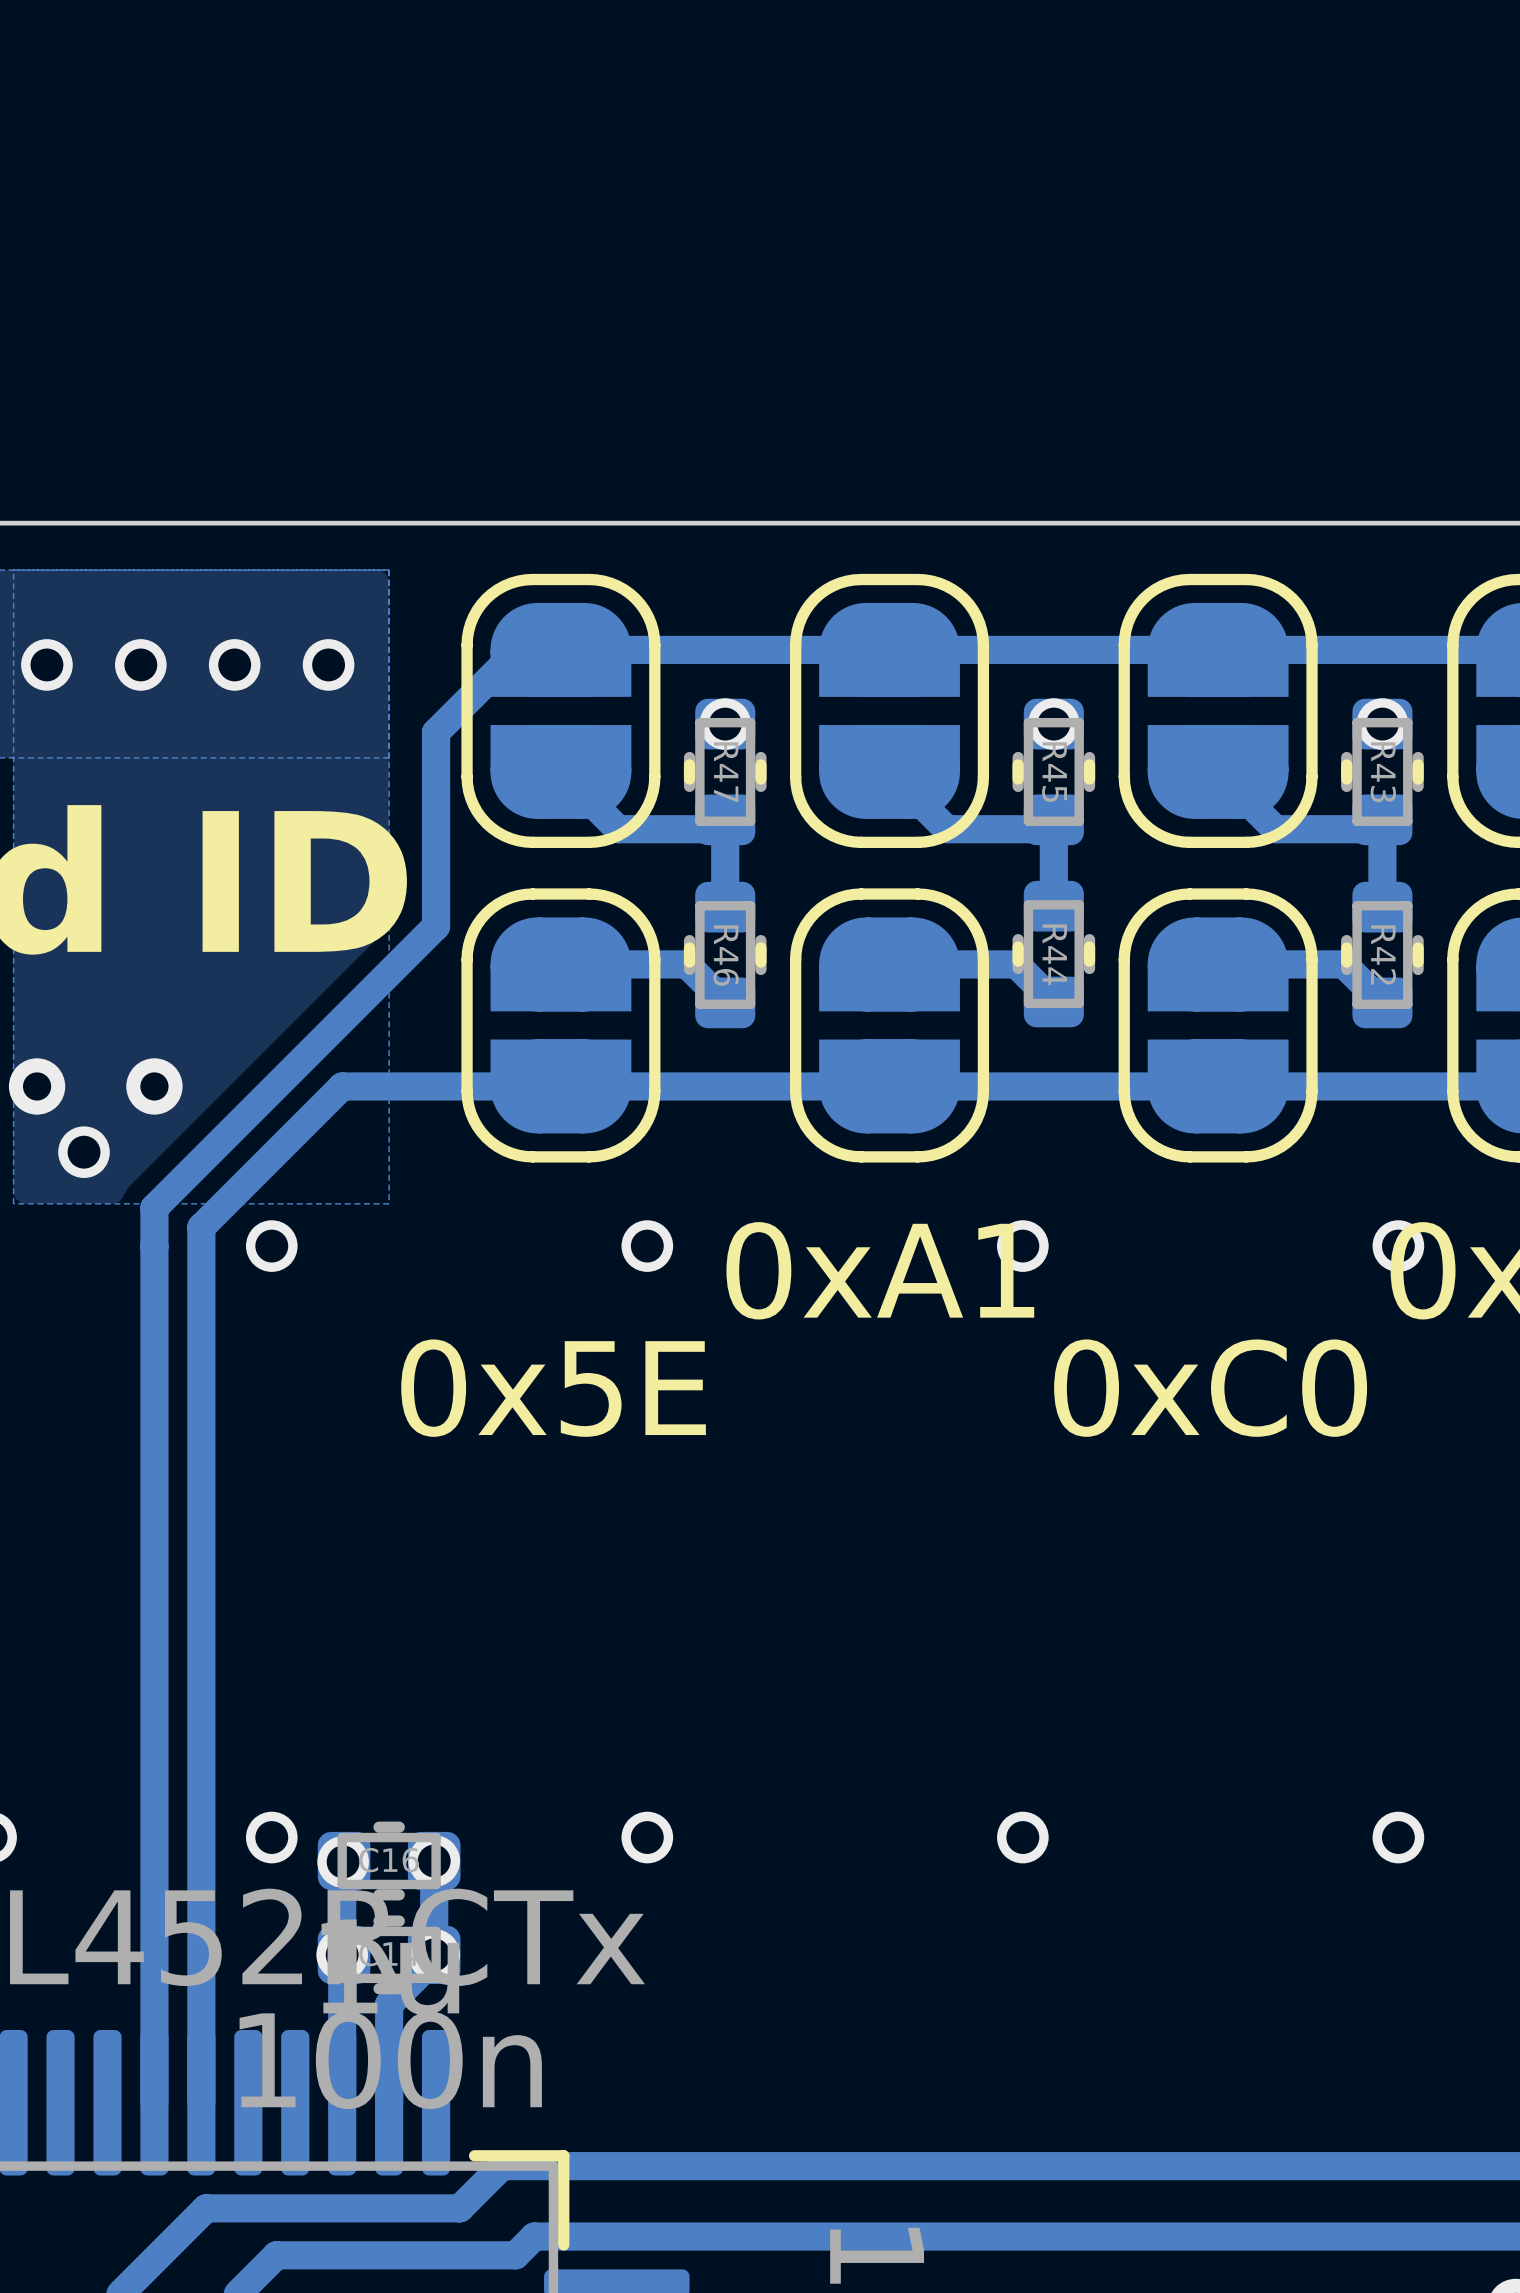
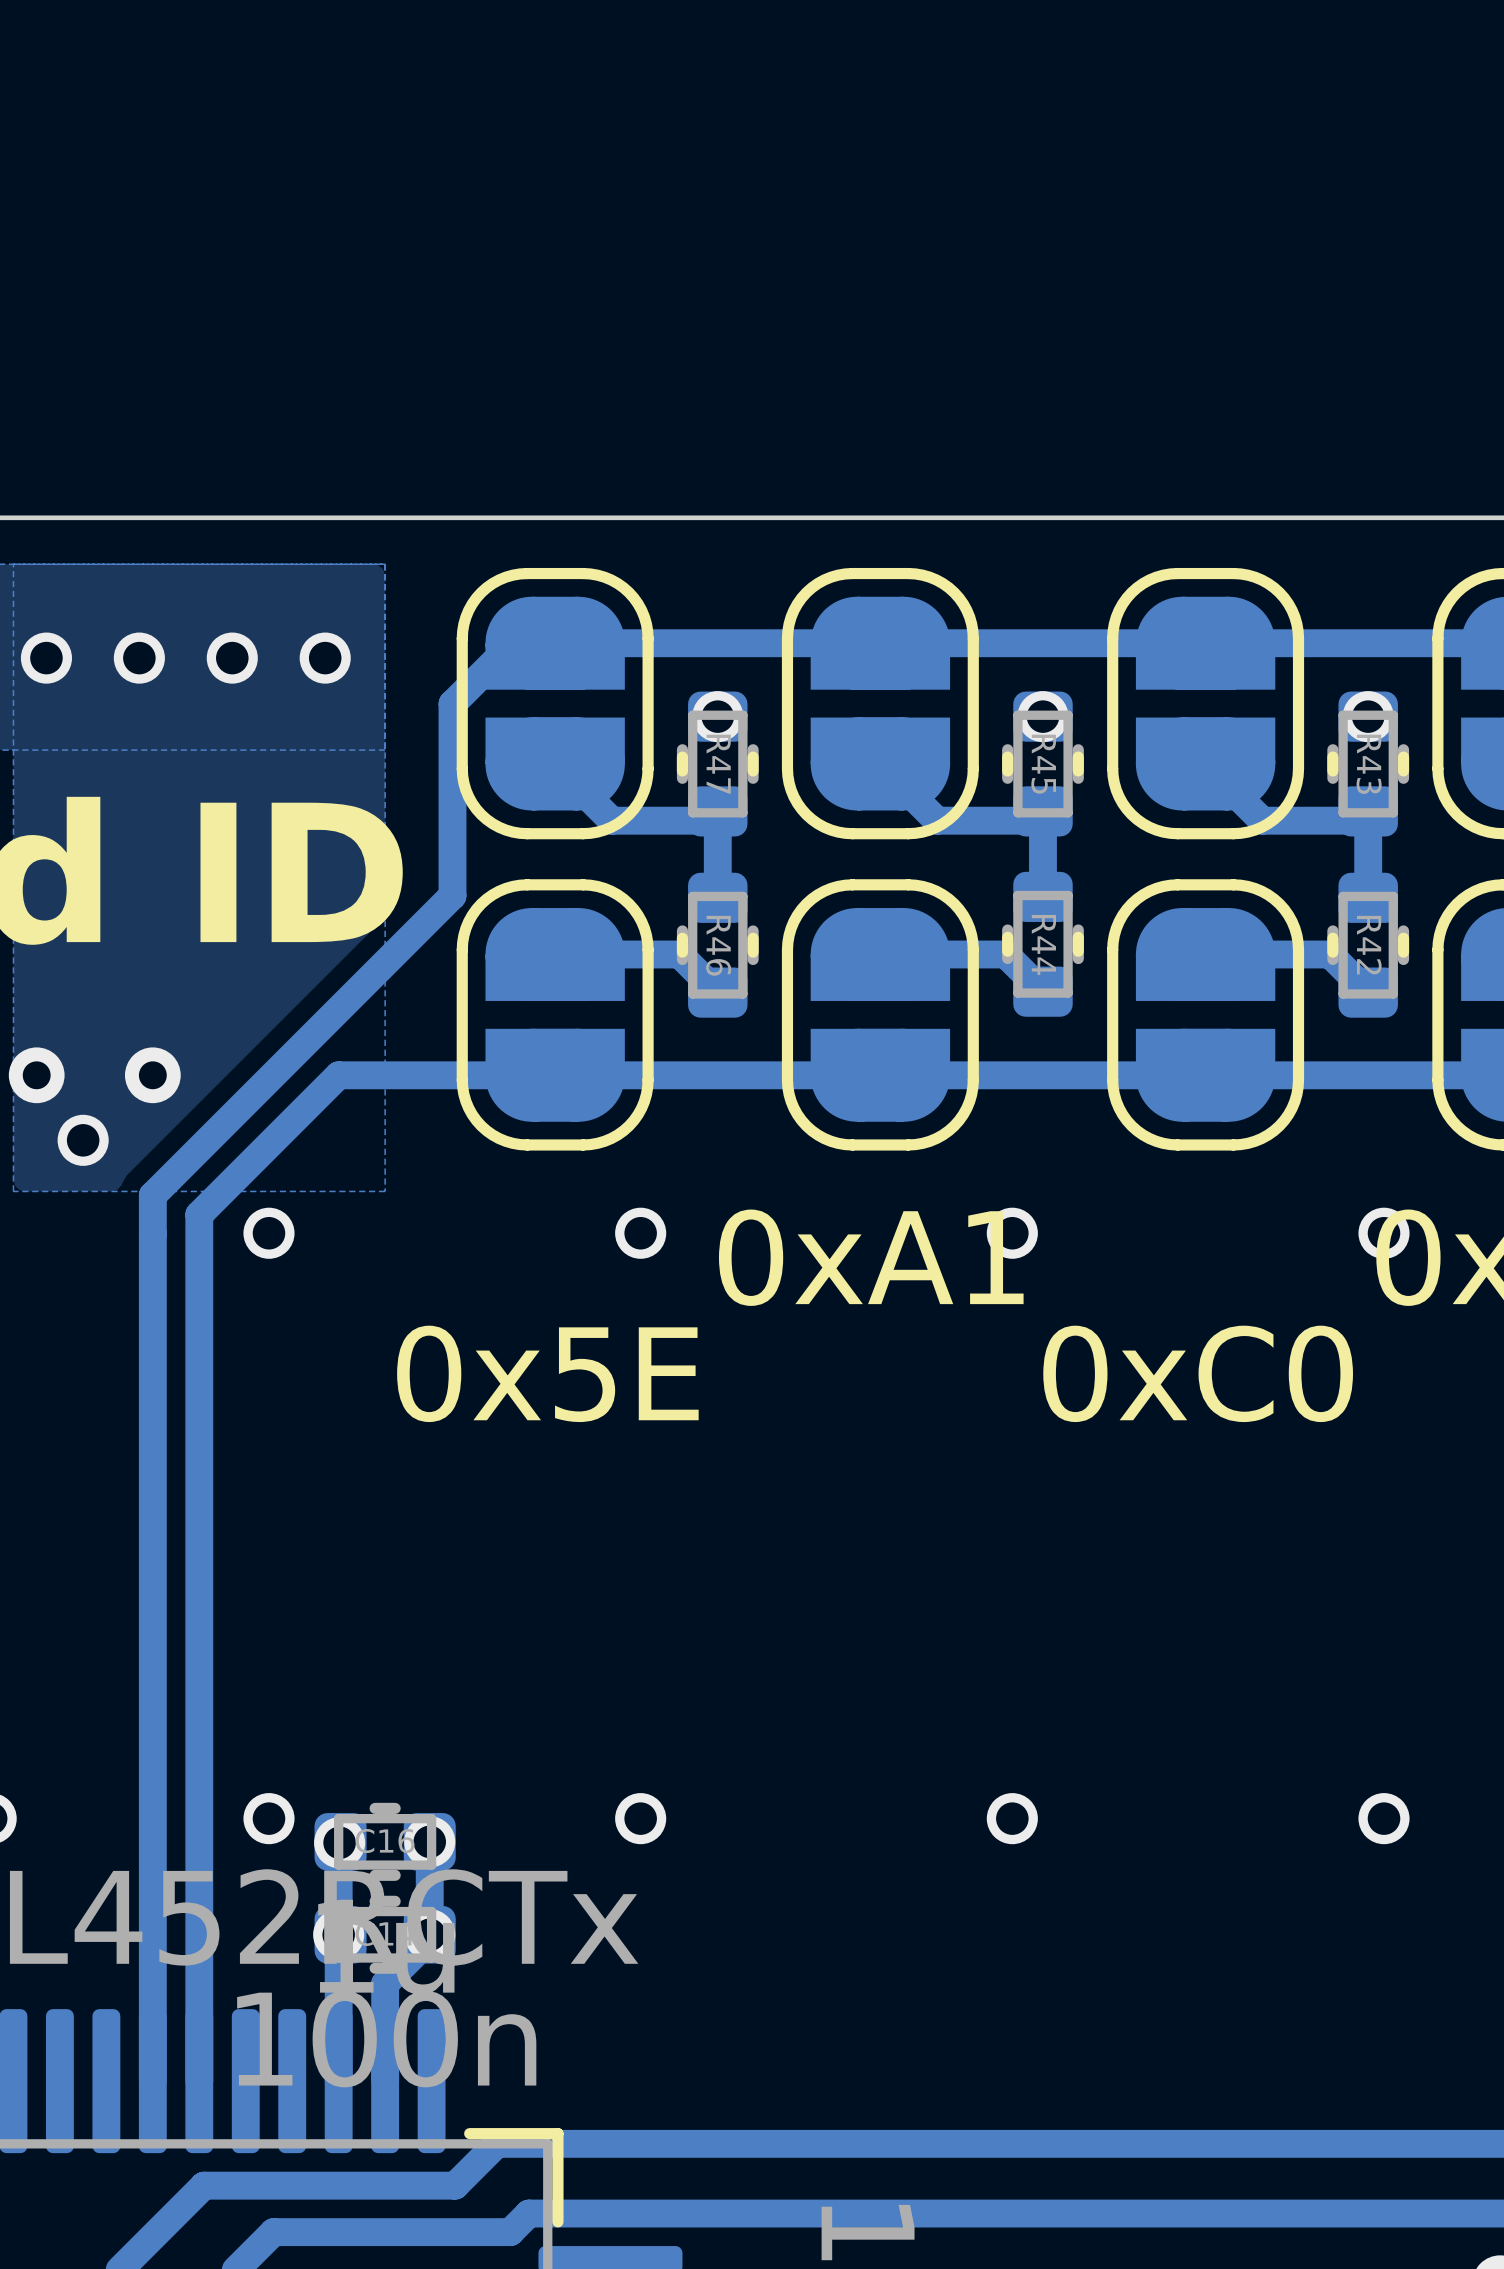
track: (457, 711) (436, 732) (436, 926) -> (452, 703) (452, 895) (431, 916)

